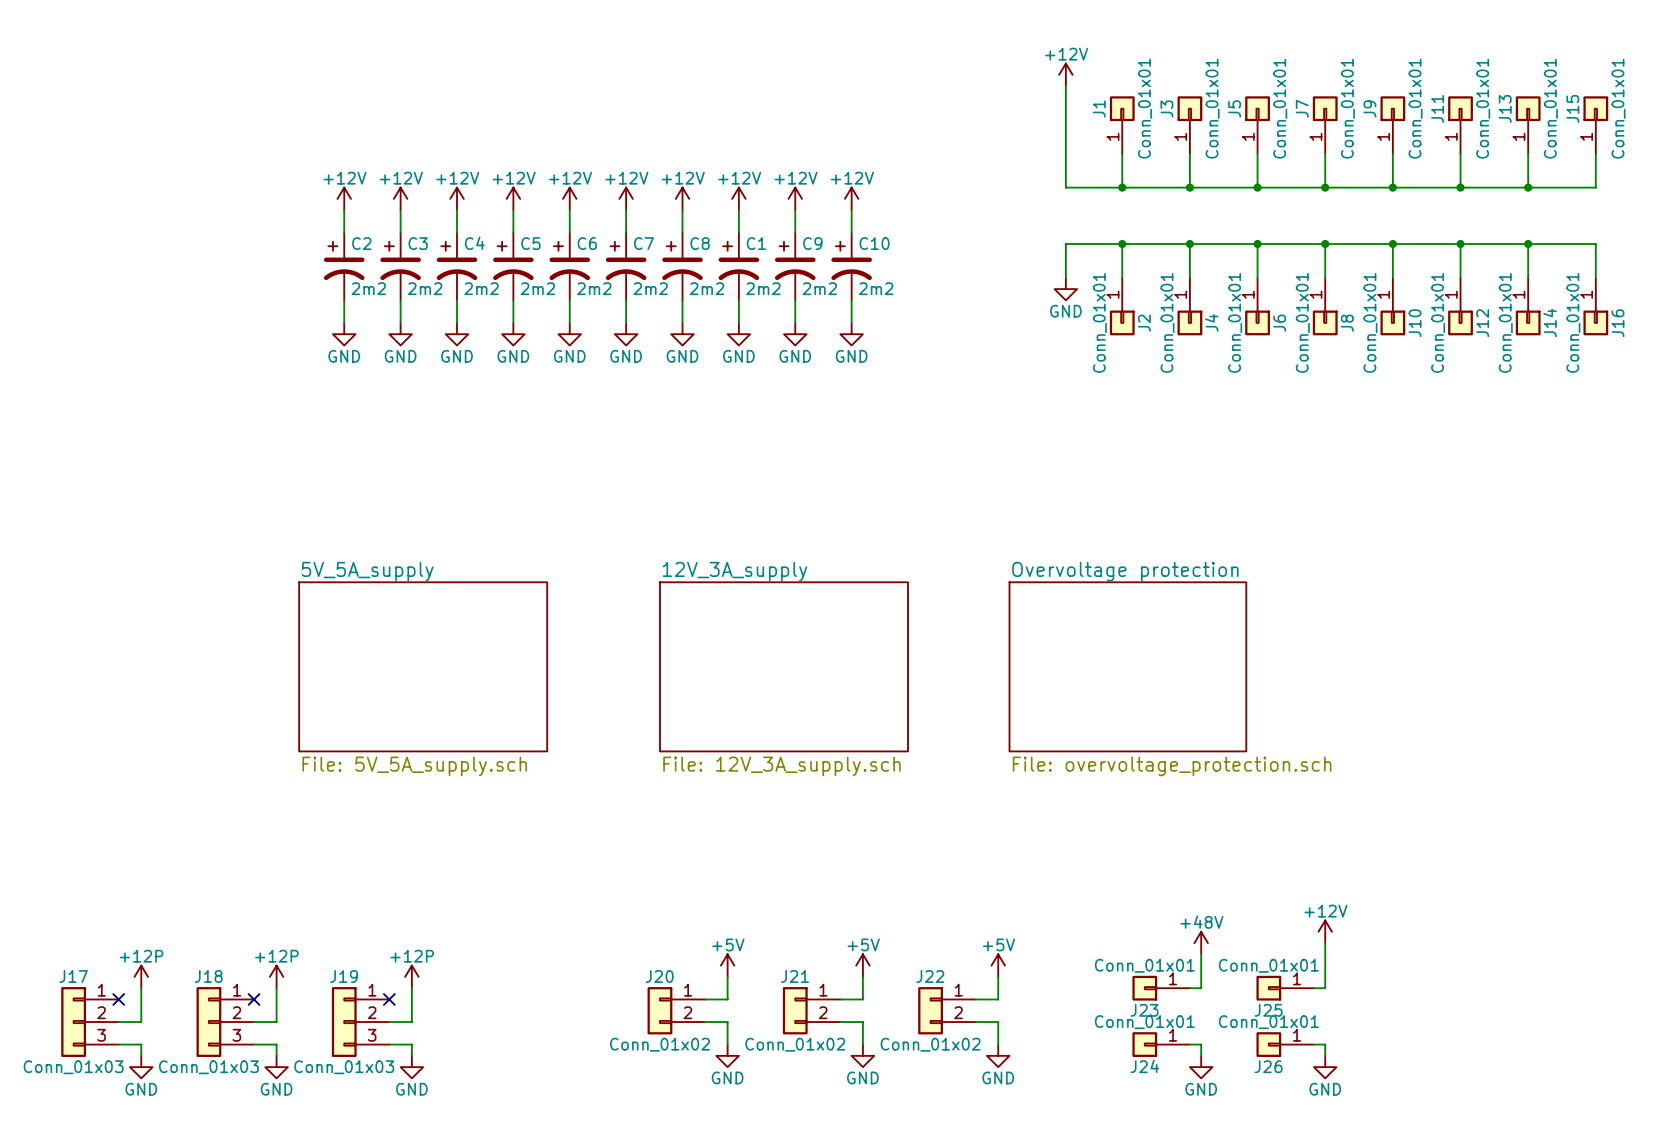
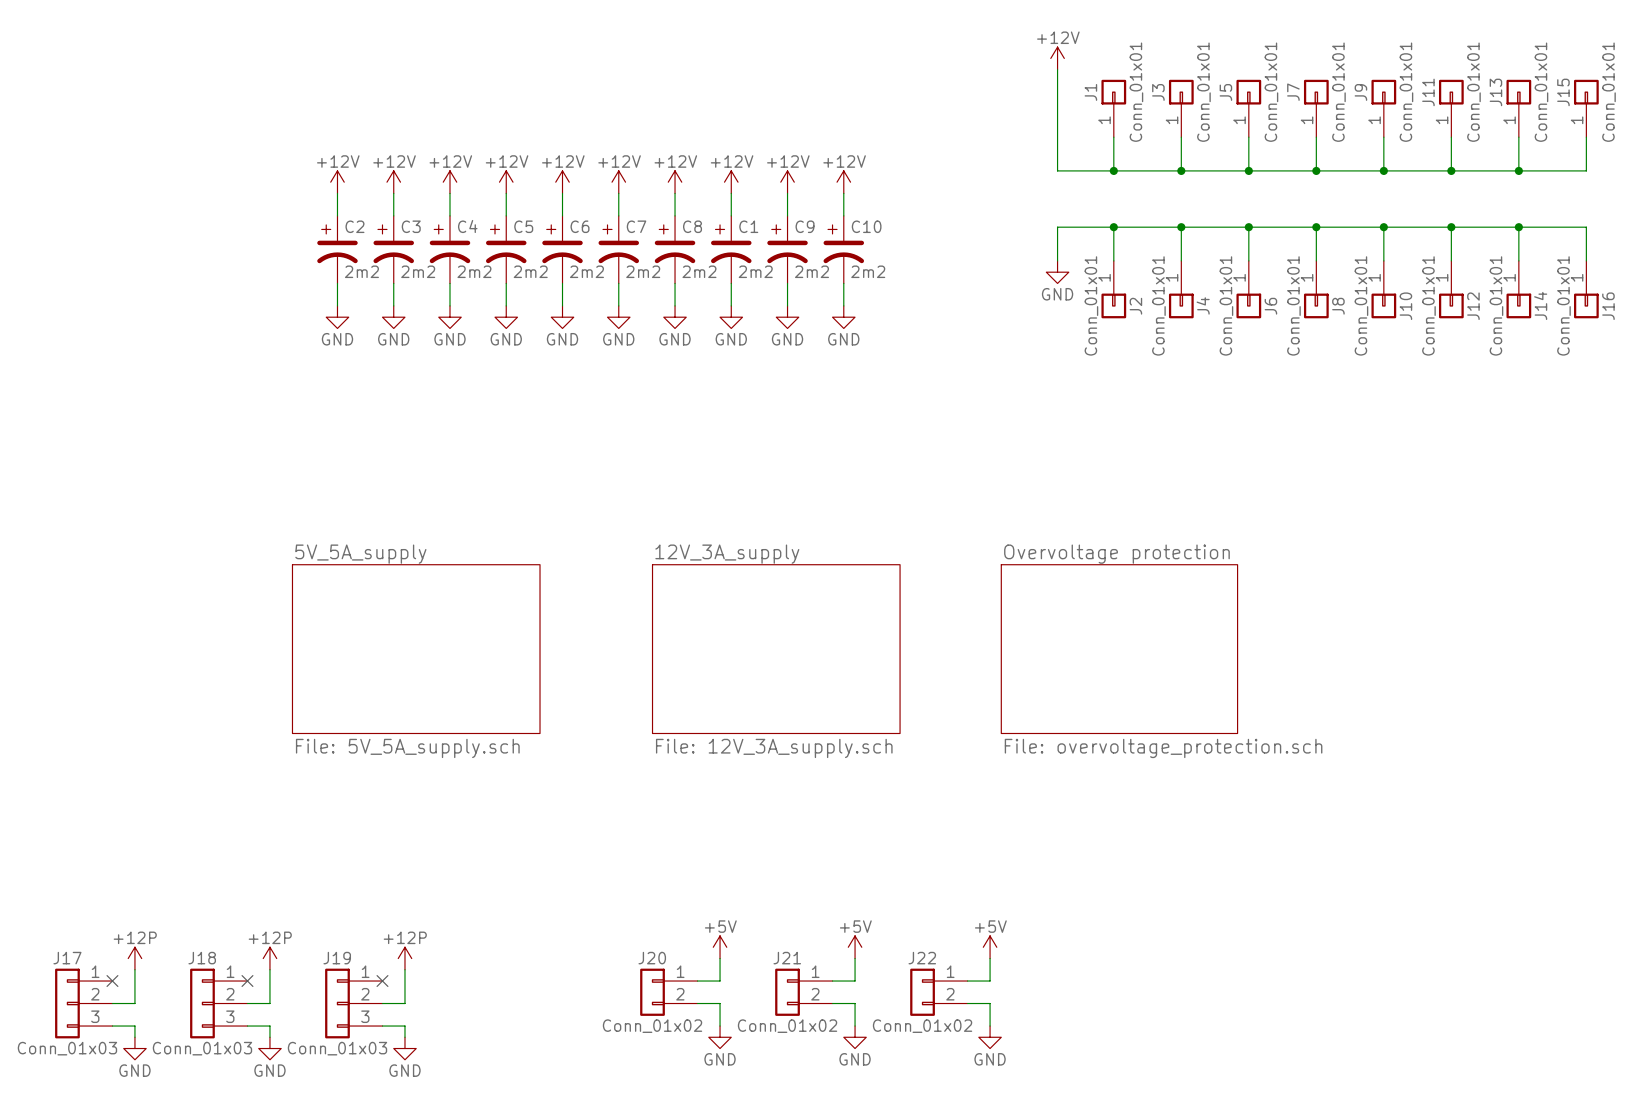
power symbol: +12V (1325, 931) -> none
power symbol: +48V (1201, 943) -> none
wire: (1325, 943) (1325, 988) (1313, 988) -> none
wire: (1201, 954) (1201, 988) (1189, 988) -> none
J23: Conn_01x01 (1161, 988) -> none
J25: Conn_01x01 (1285, 988) -> none
J24: Conn_01x01 (1161, 1044) -> none
wire: (1189, 1044) (1201, 1044) (1201, 1055) -> none
J26: Conn_01x01 (1285, 1044) -> none
wire: (1313, 1044) (1325, 1044) (1325, 1055) -> none
power symbol: GND (1201, 1067) -> none
power symbol: GND (1325, 1067) -> none

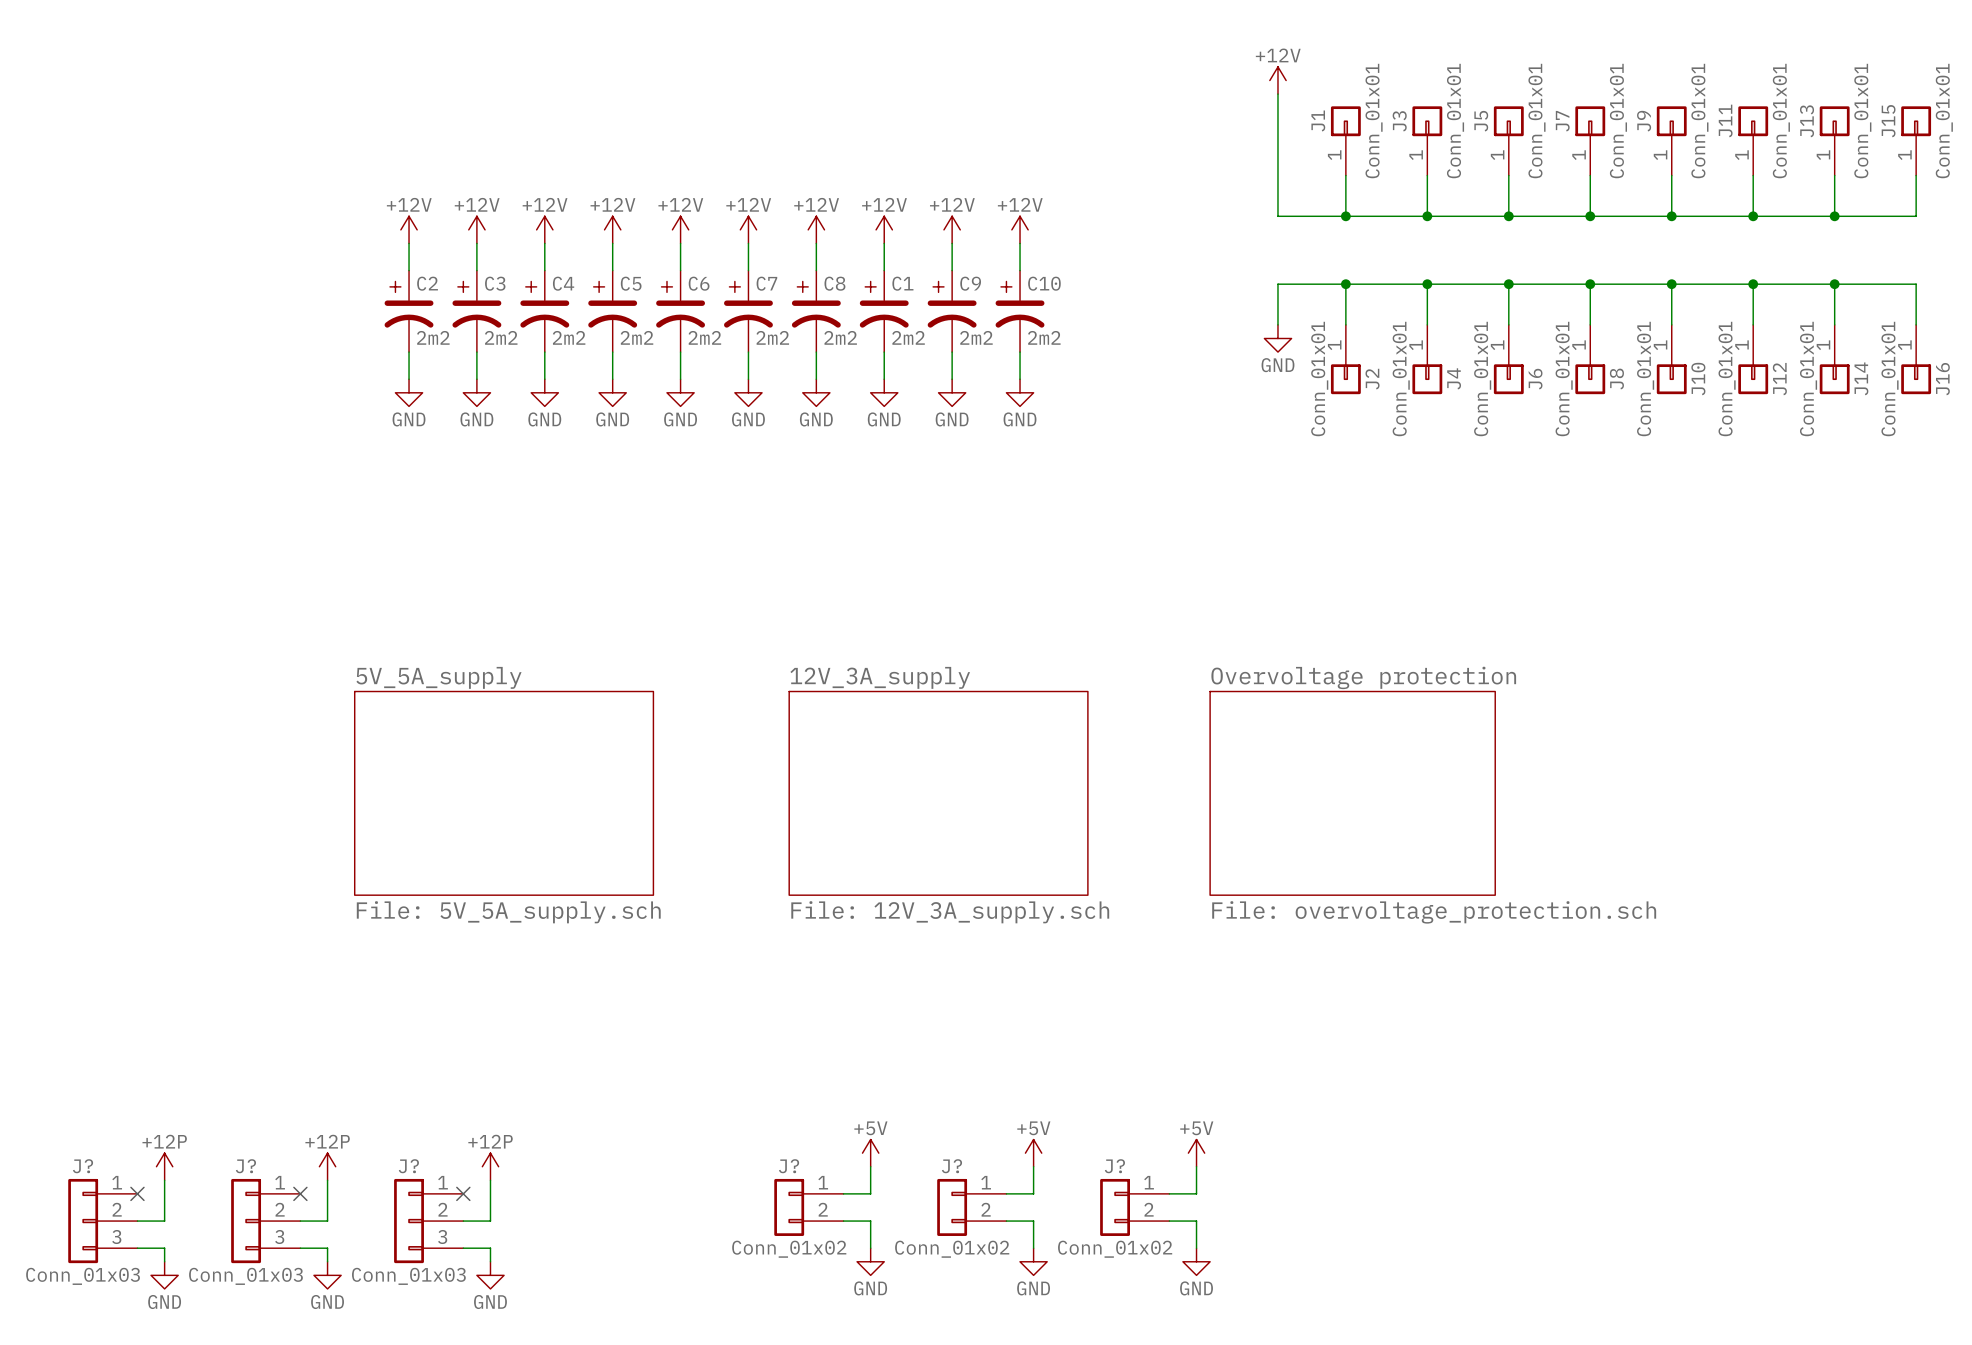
J17 name: J17 (67, 958) -> J? (83, 1166)
J18 name: J18 (202, 958) -> J? (245, 1166)
J19 name: J19 (337, 958) -> J? (408, 1166)
J20 name: J20 (652, 958) -> J? (789, 1166)
J21 name: J21 (787, 958) -> J? (951, 1166)
J22 name: J22 (922, 958) -> J? (1114, 1166)

